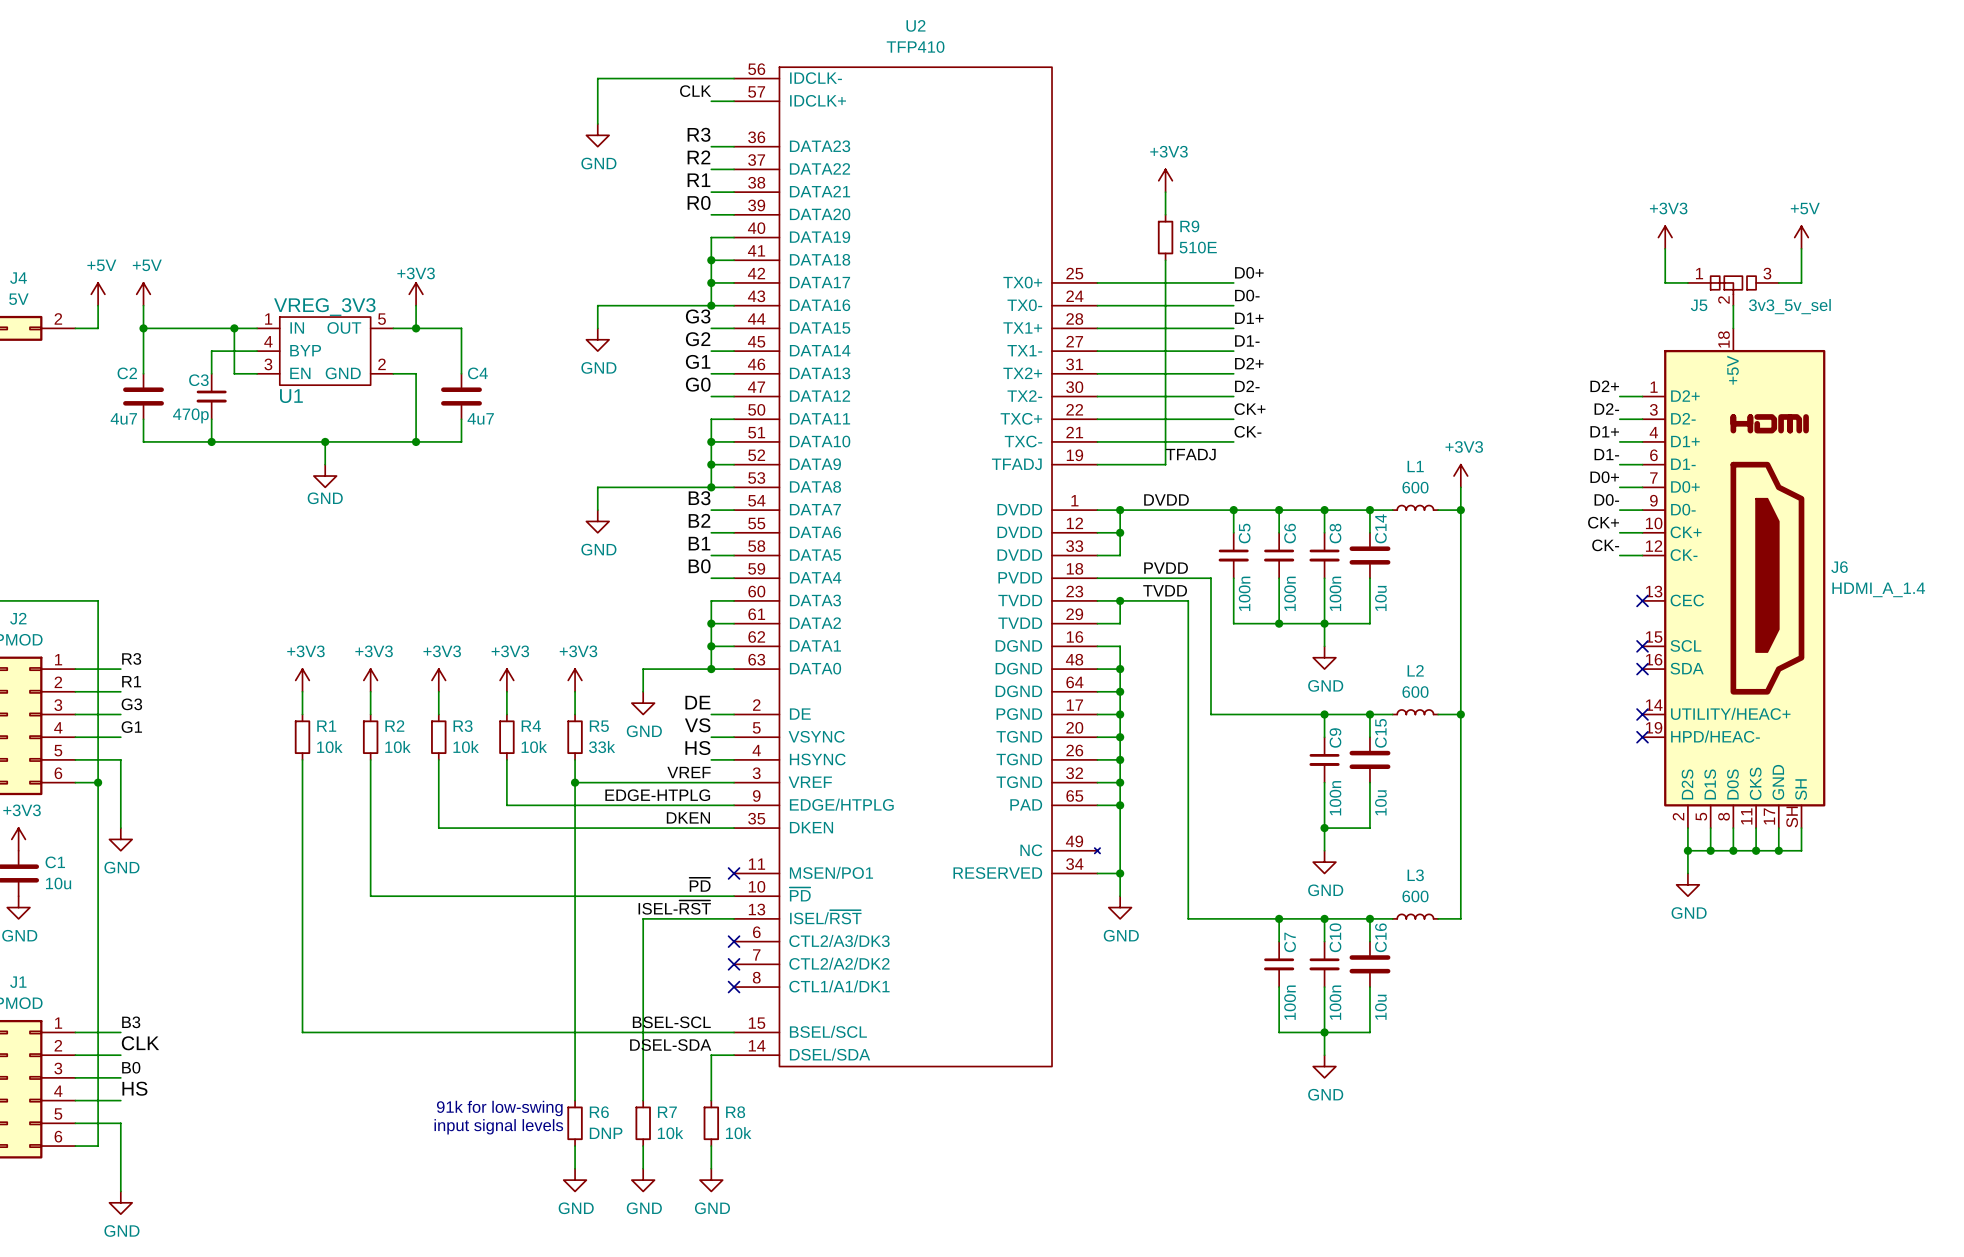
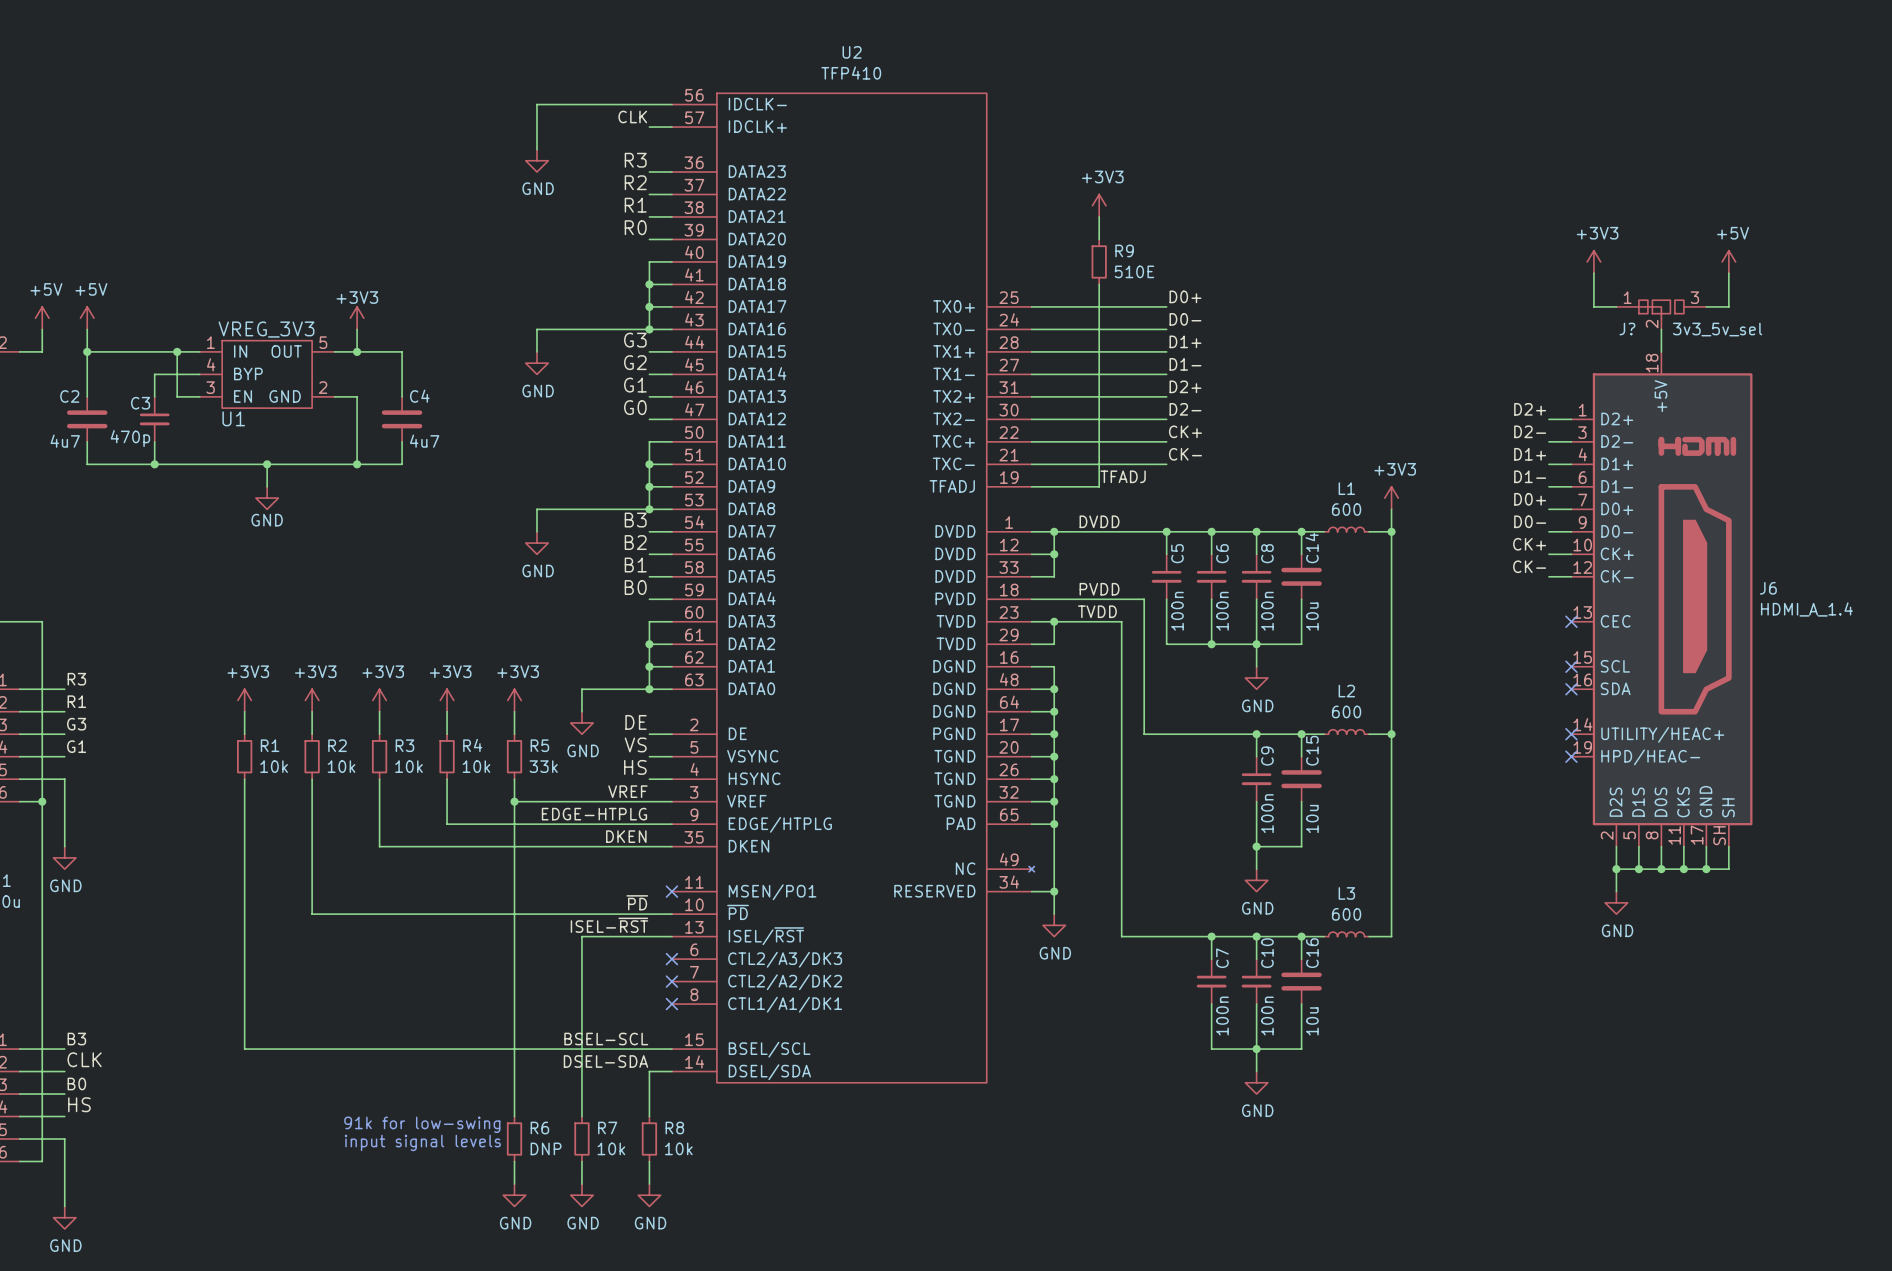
J5 name: J5 (1699, 305) -> J? (1627, 329)

